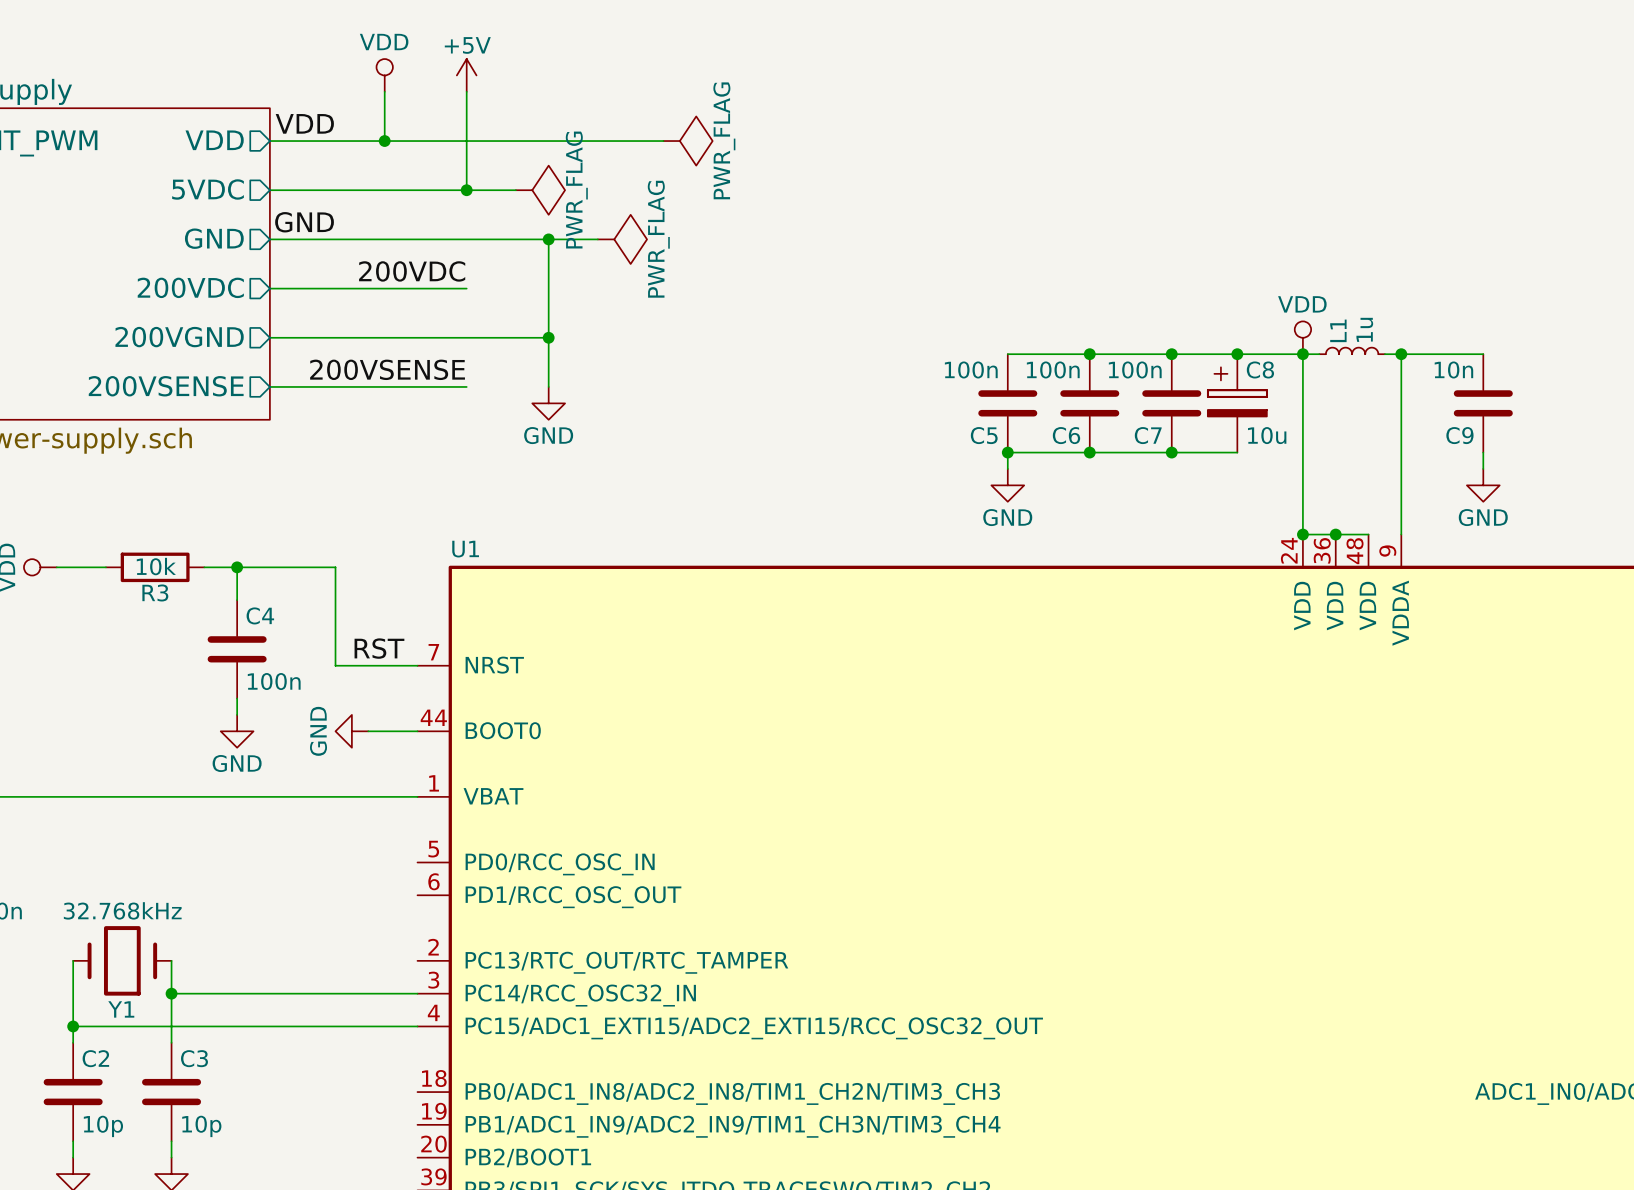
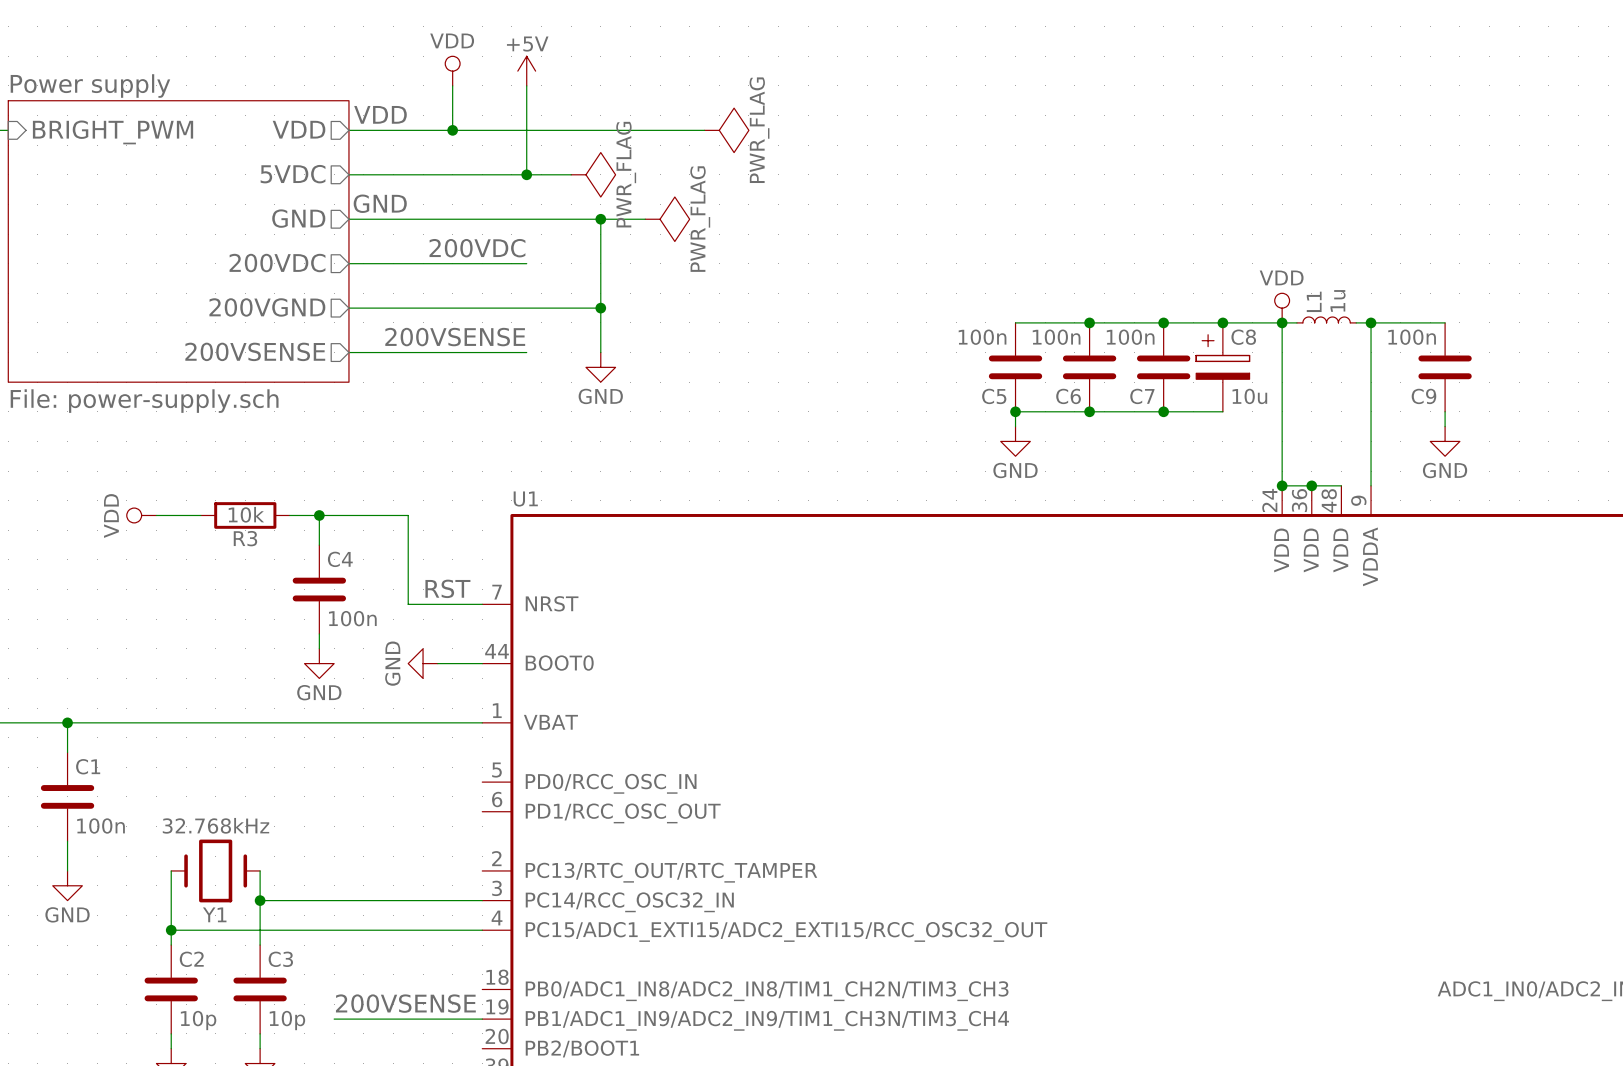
C9 value: 10n (1453, 369) -> 100n (1412, 337)
label: none -> 200VSENSE (405, 1003)
wire: none -> (334, 1019) (482, 1019)

